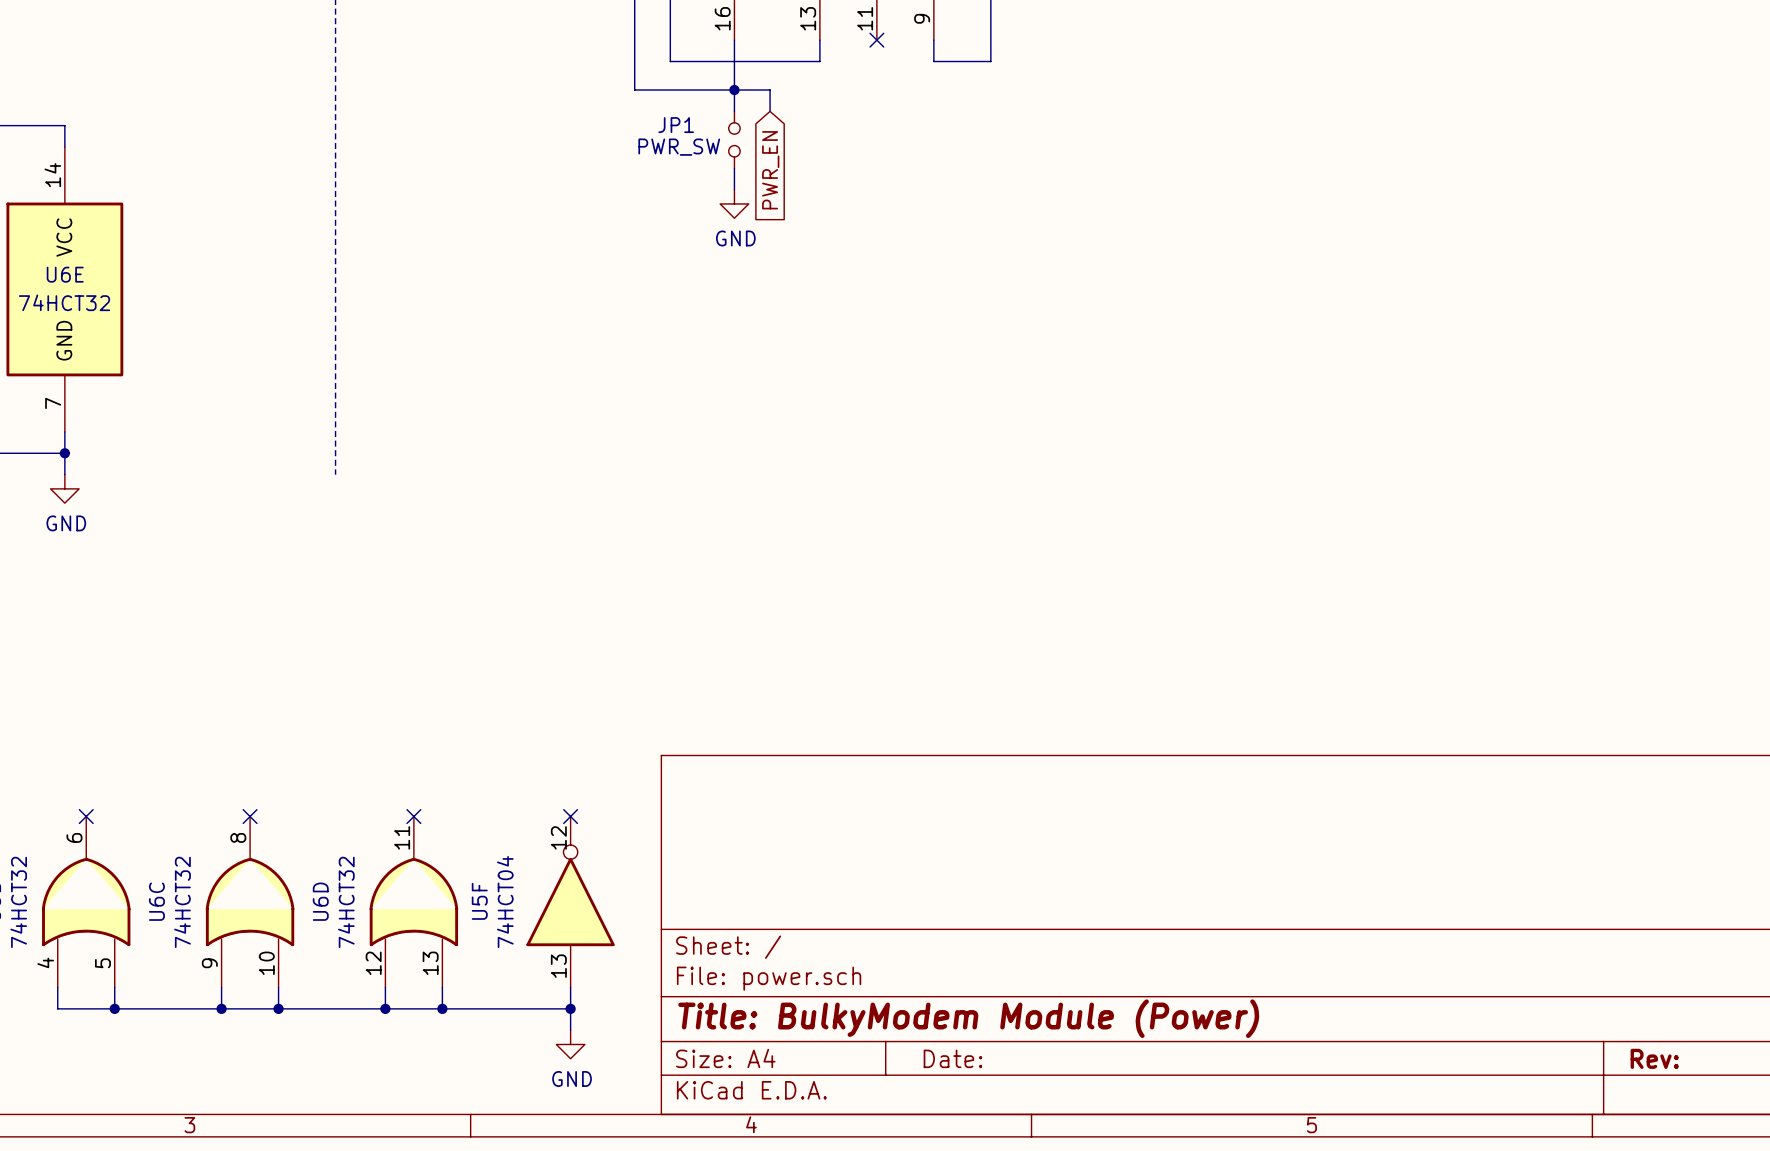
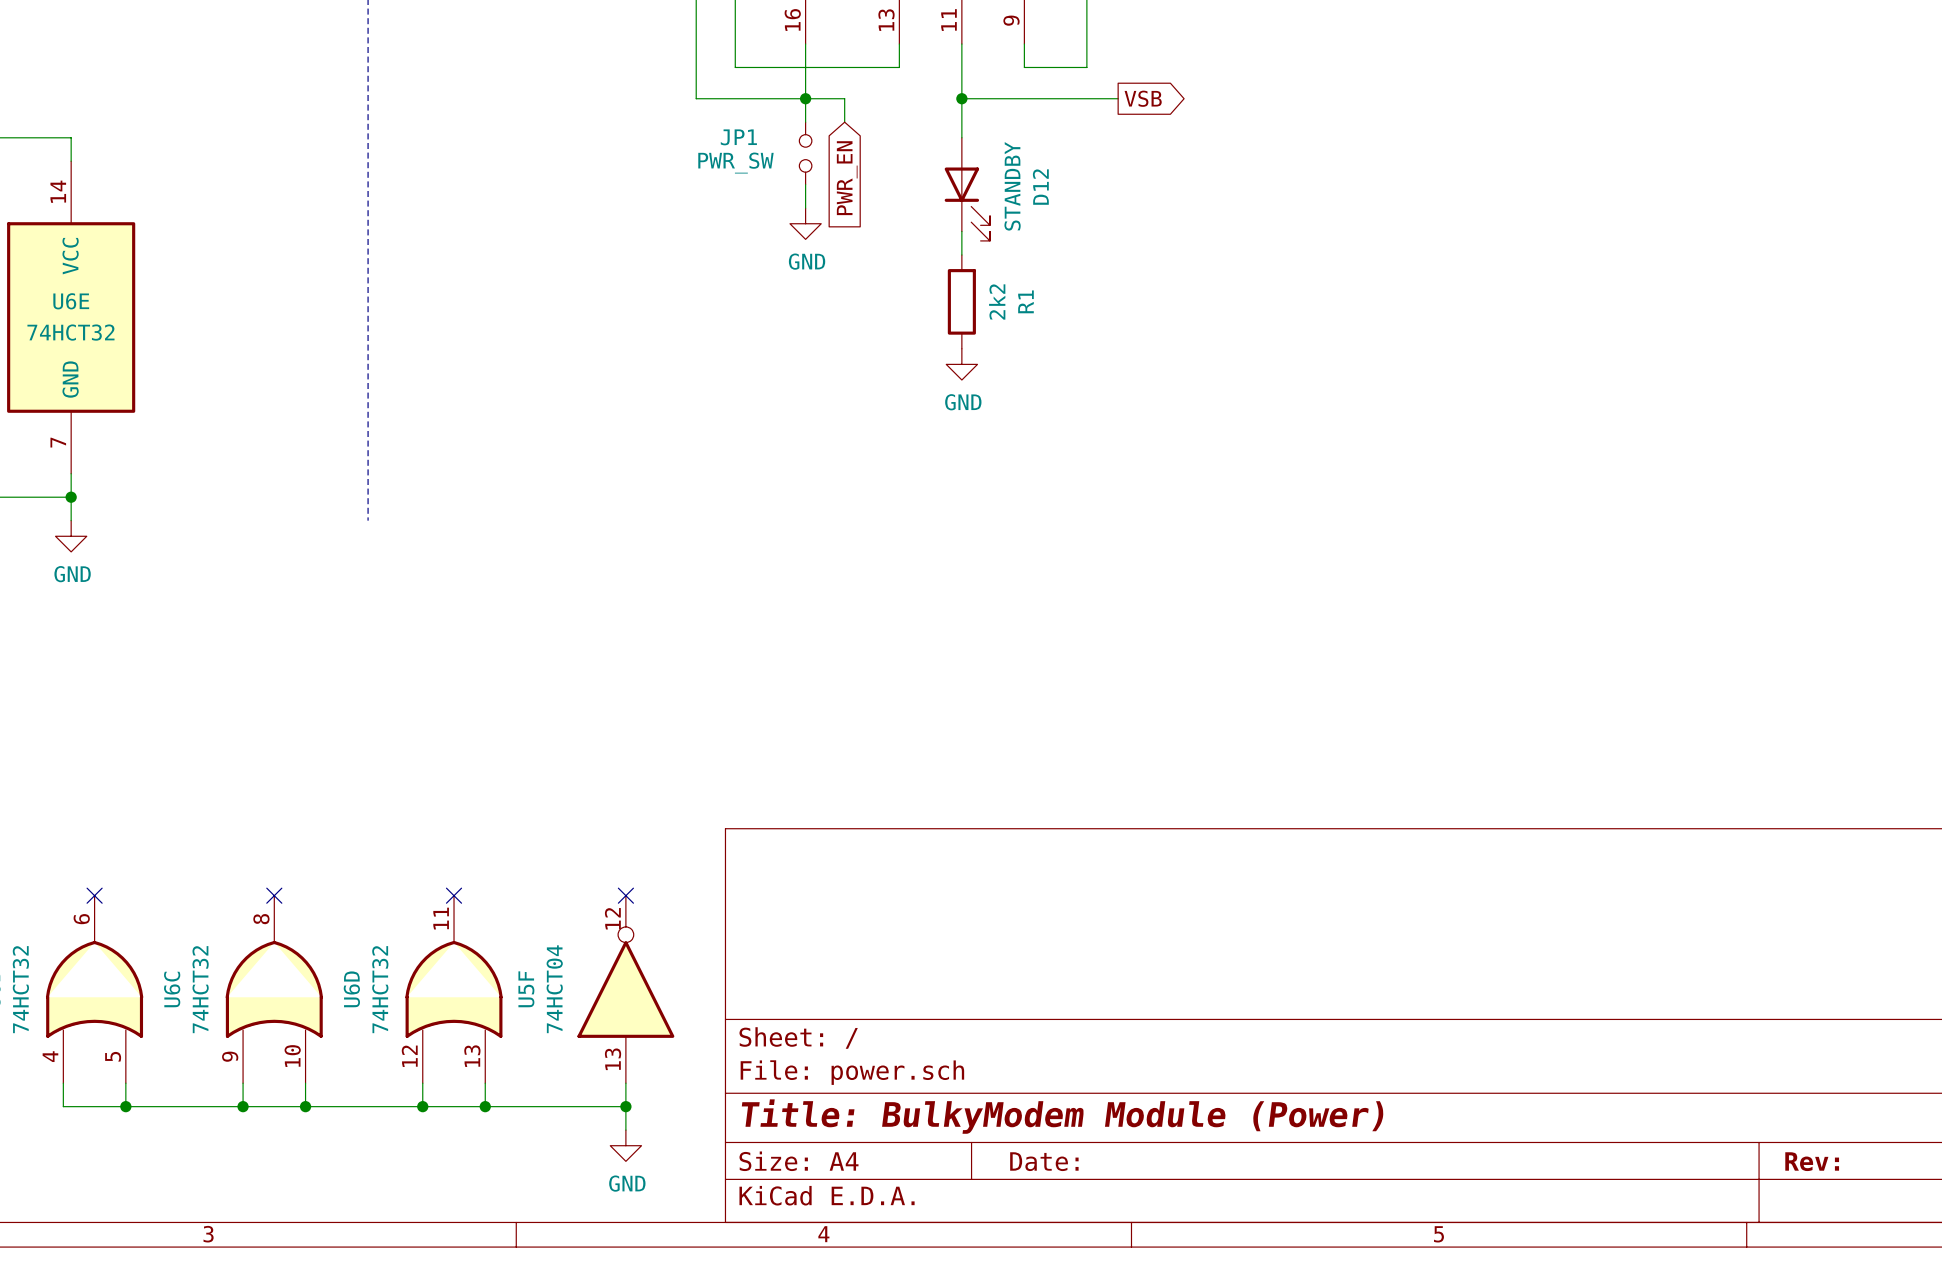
wire: none -> (961, 44) (961, 137)
no-connect mark: (876, 40) -> none
wire: none -> (961, 98) (1118, 98)
junction: none -> (961, 98)
global label: none -> VSB (1143, 98)
D12: none -> STANDBY (967, 189)
wire: none -> (961, 231) (961, 254)
R1: none -> 2k2 (961, 301)
power symbol: none -> GND (961, 364)

